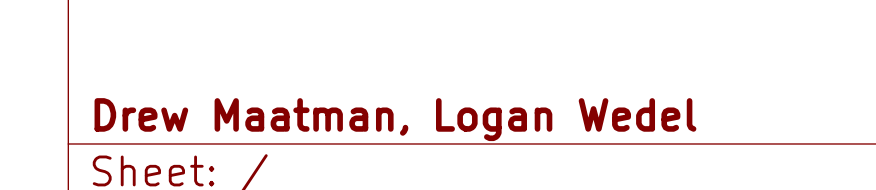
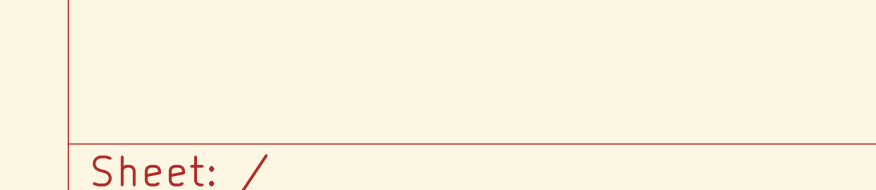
title block: Drew Maatman, Logan Wedel (395, 119) -> none

